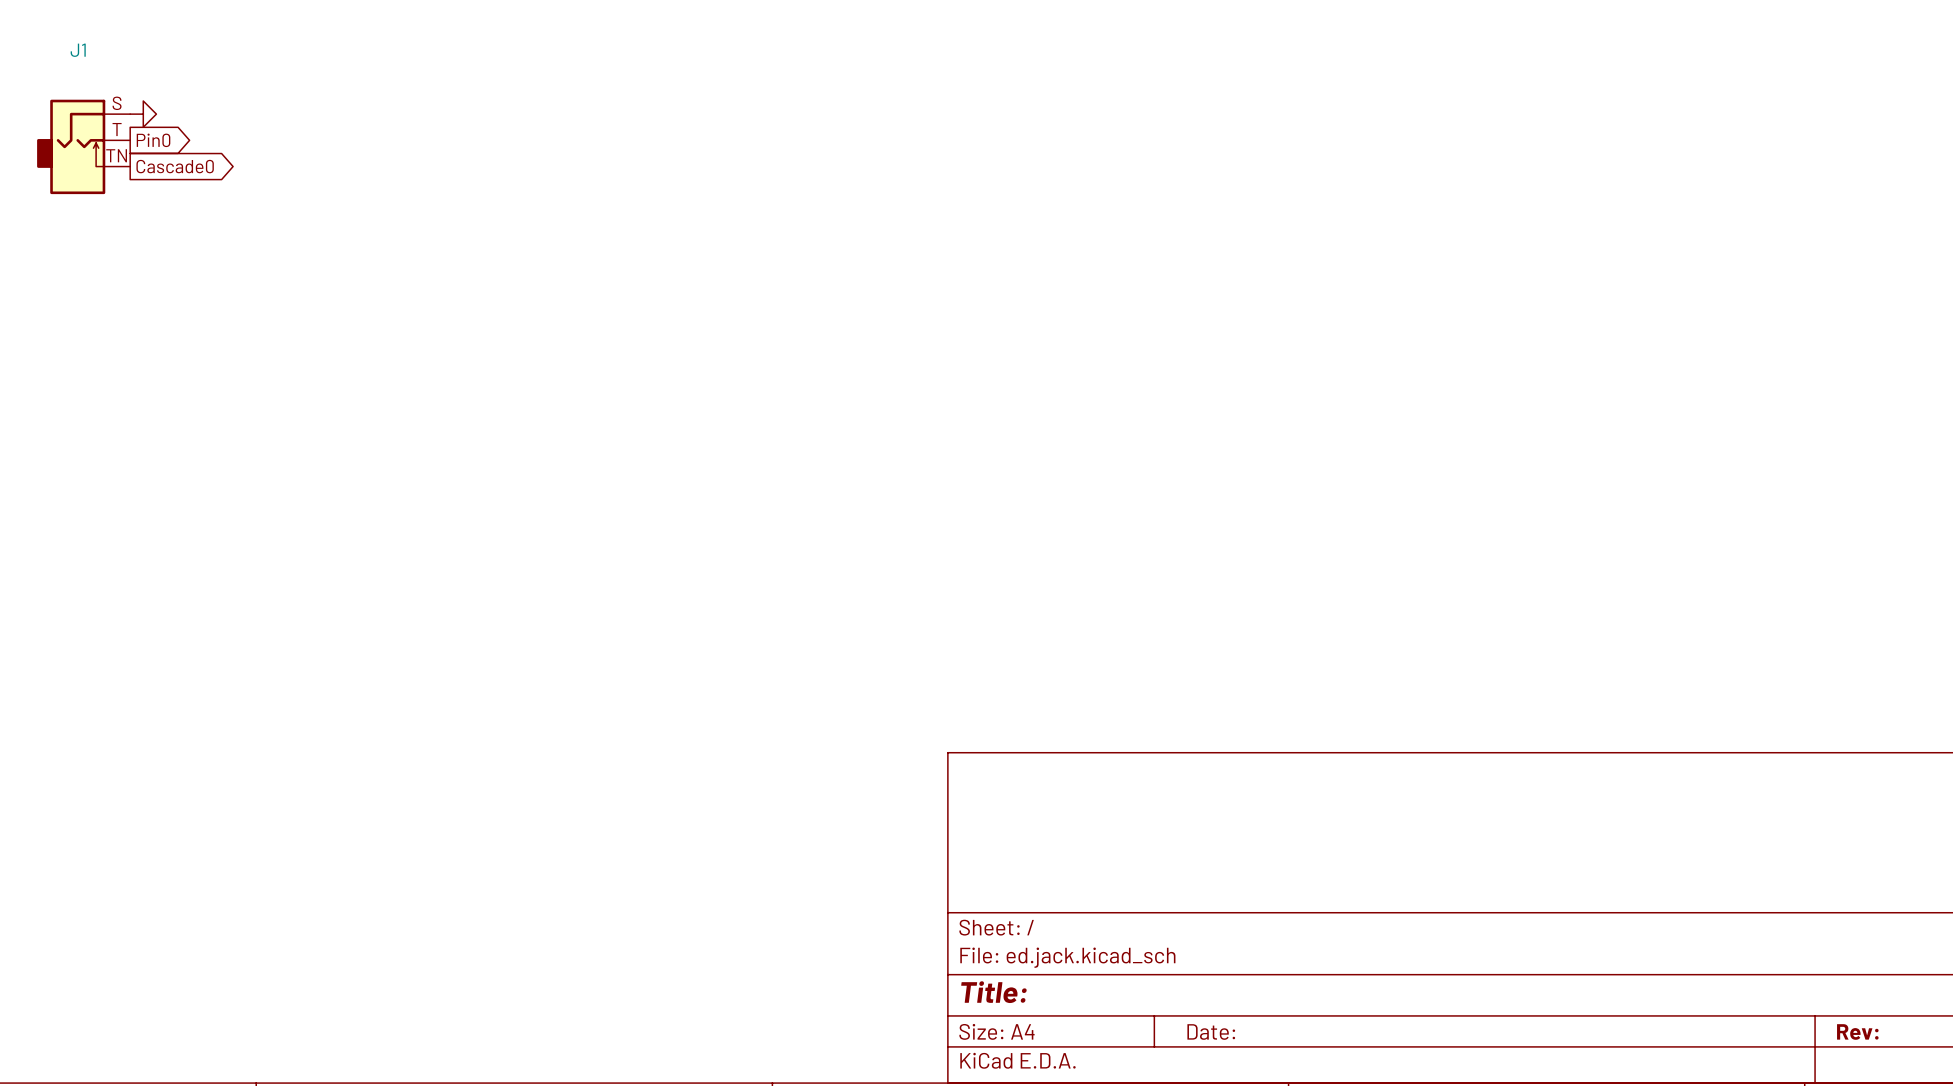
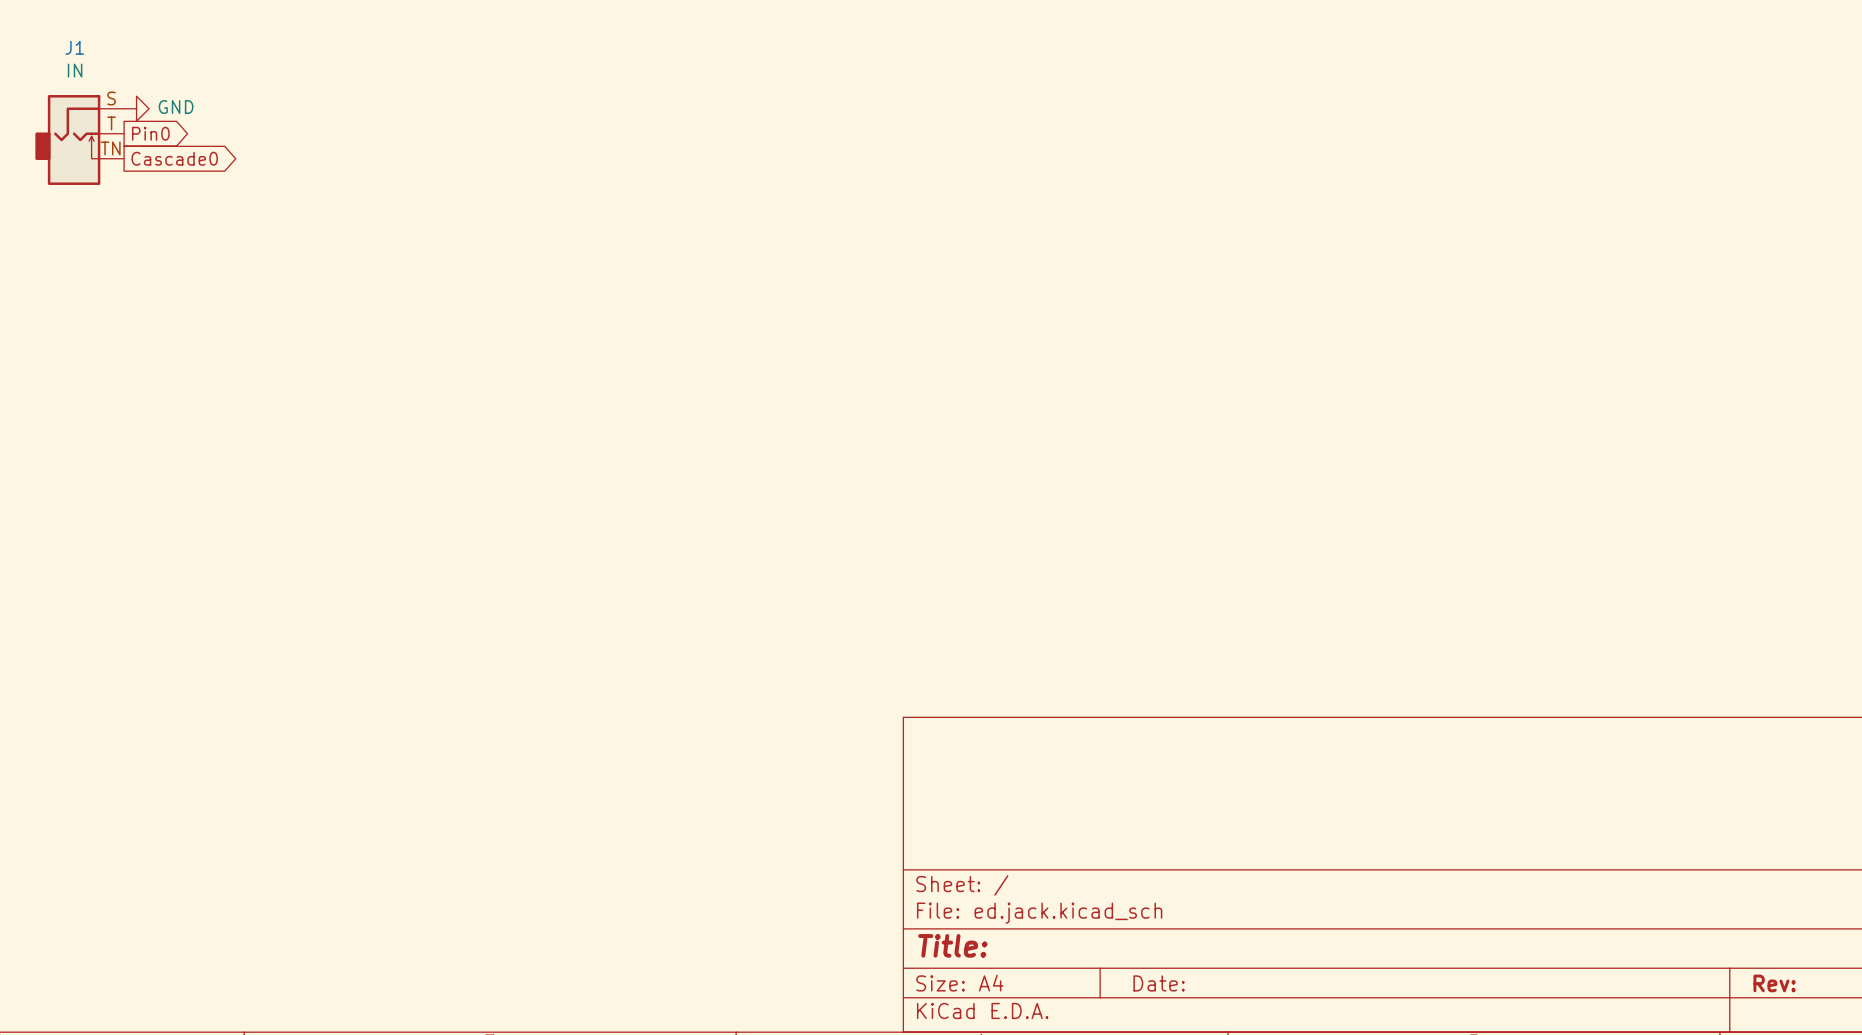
J1 value: none -> IN (75, 70)
power symbol text: none -> GND (176, 107)

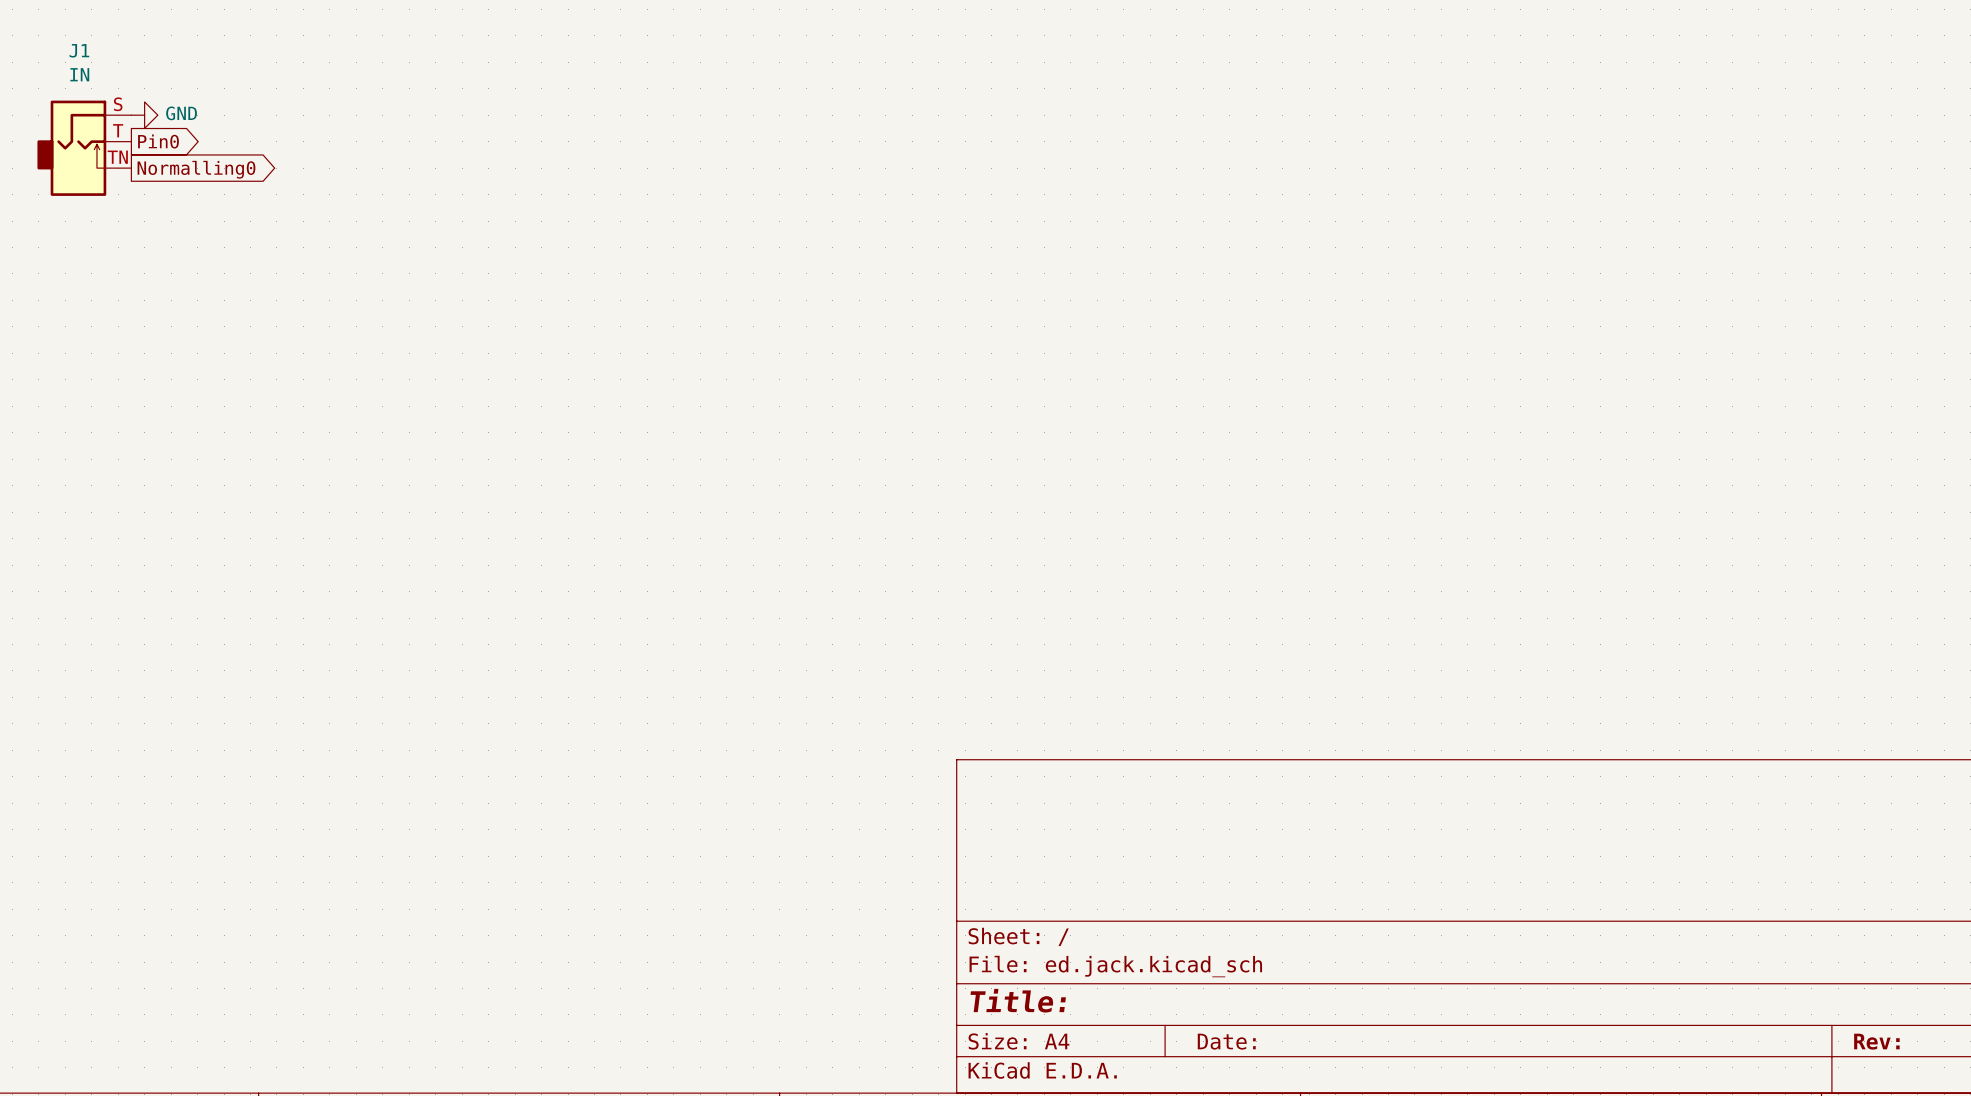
global label: Cascade0 (174, 158) -> Normalling0 (196, 169)

